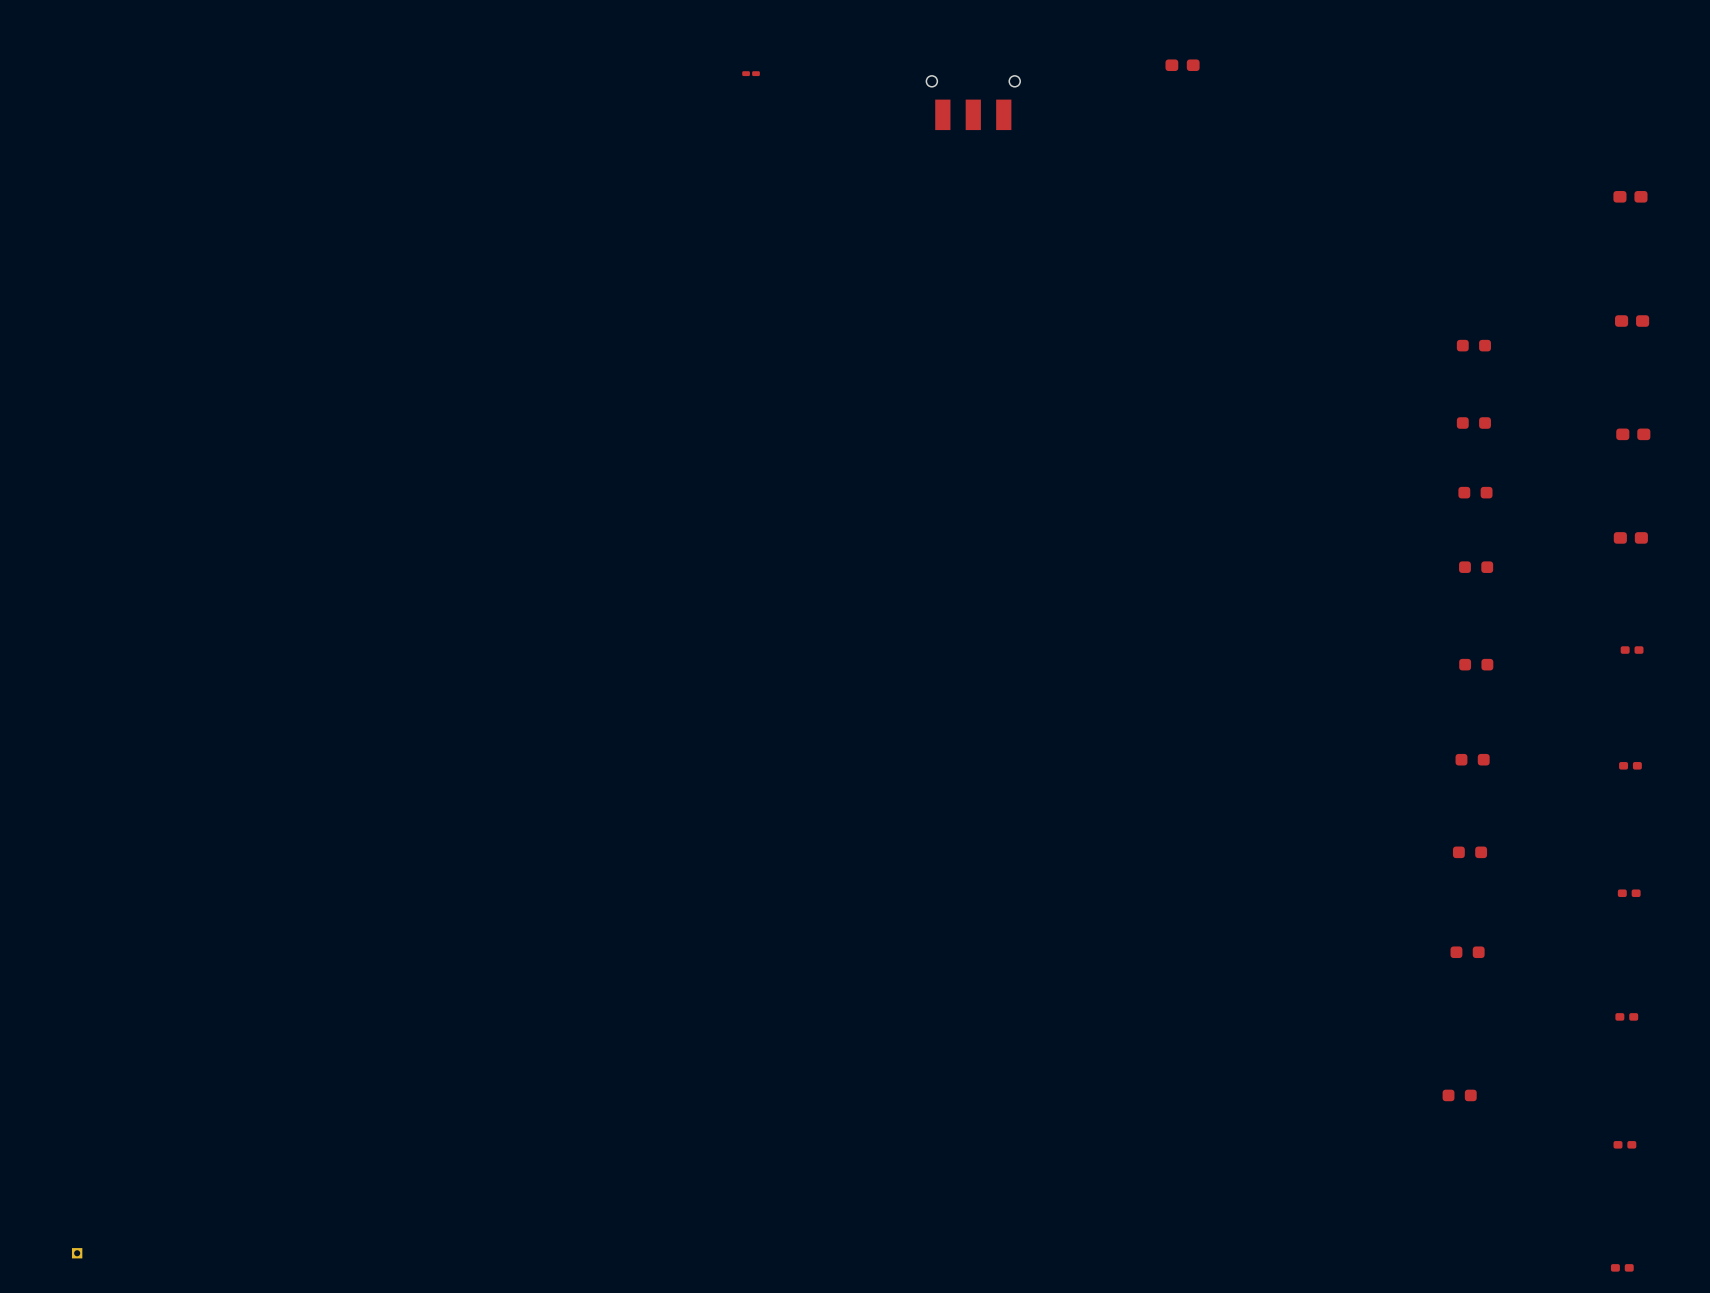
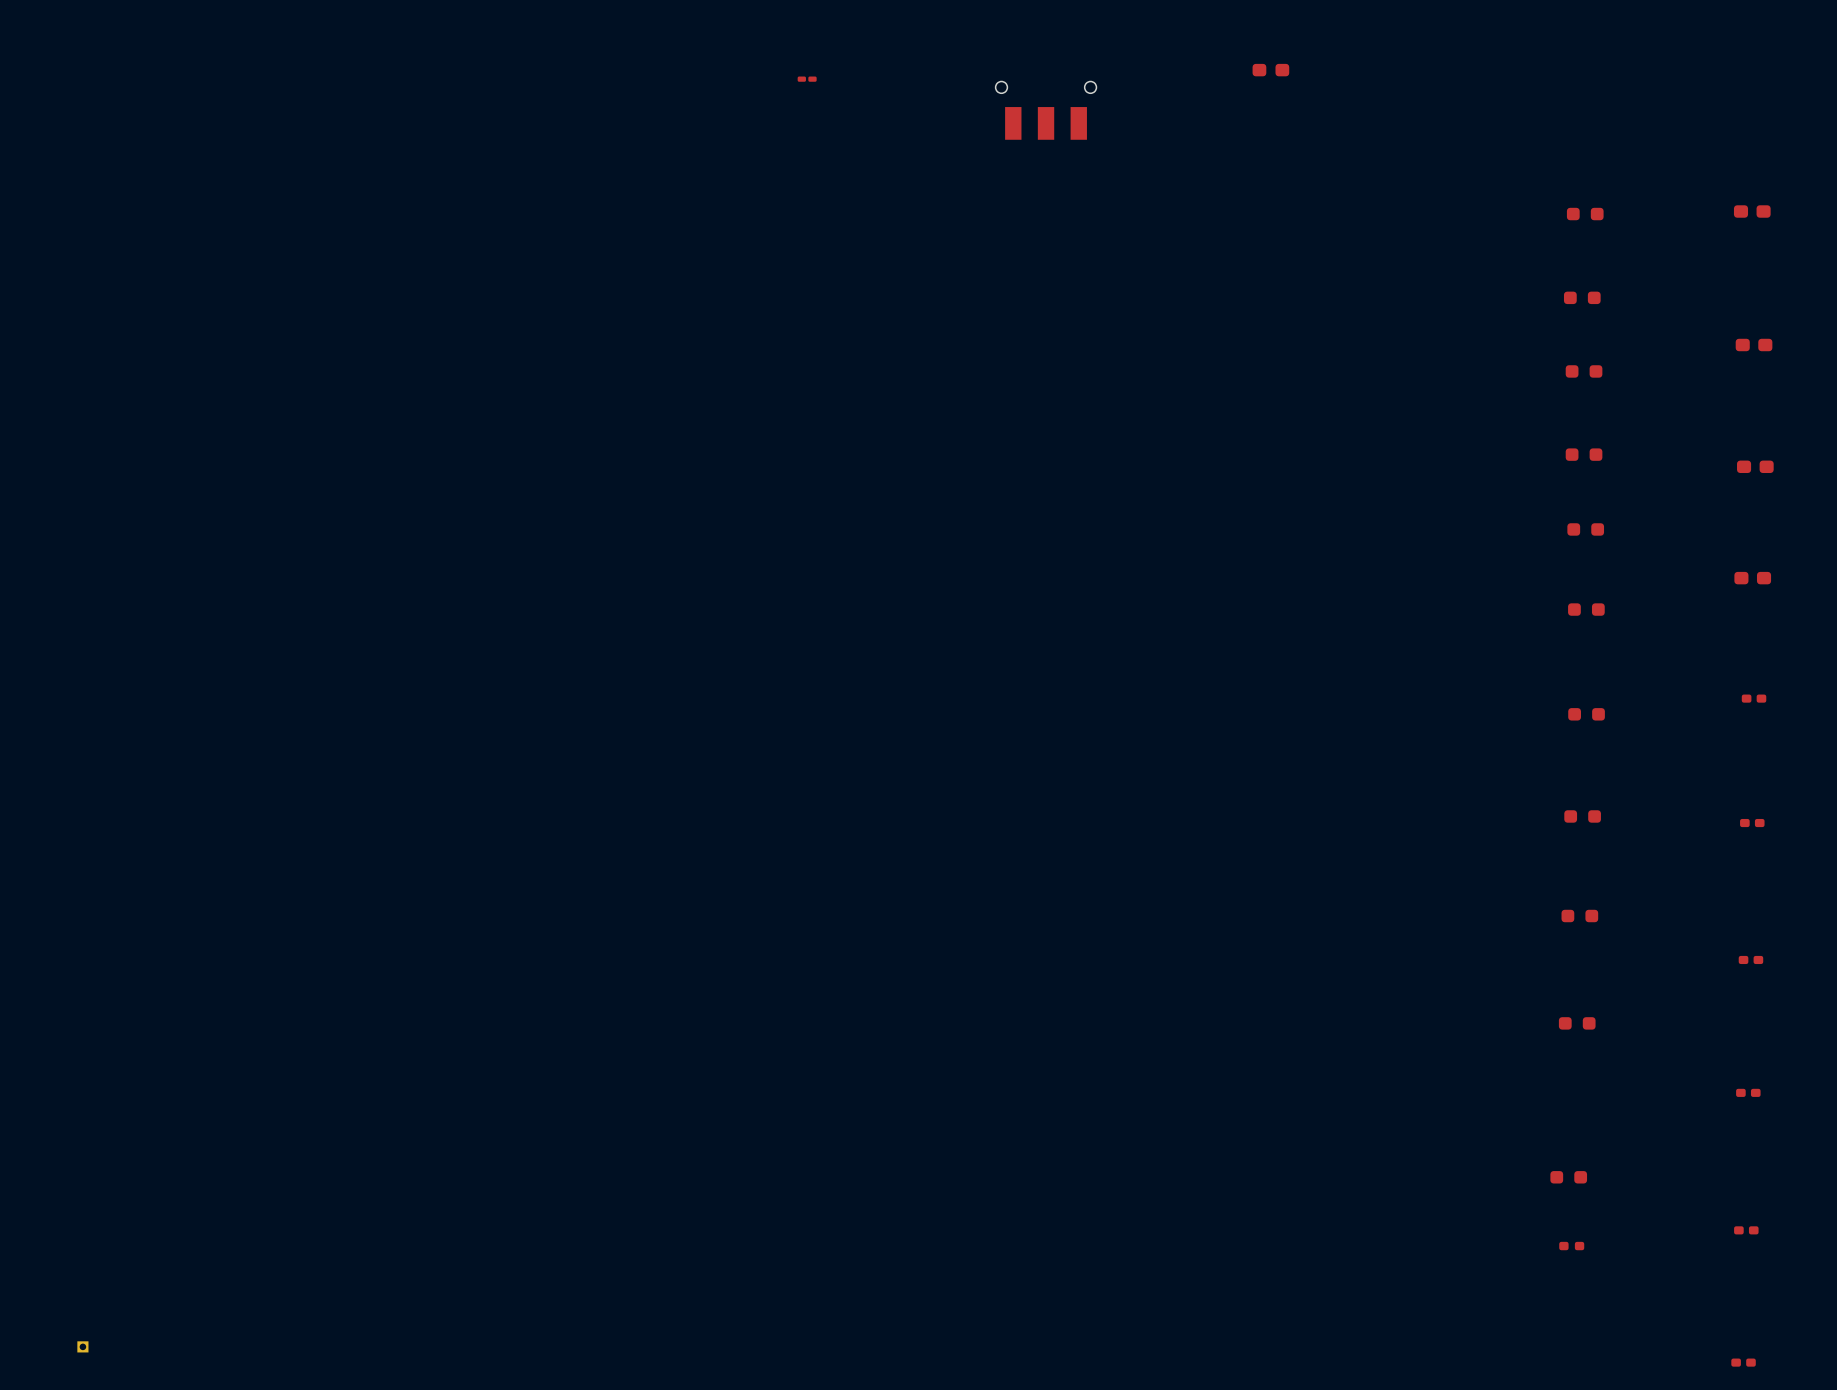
part: none -> (1585, 214)
part: none -> (1582, 297)
part: none -> (1571, 1246)

